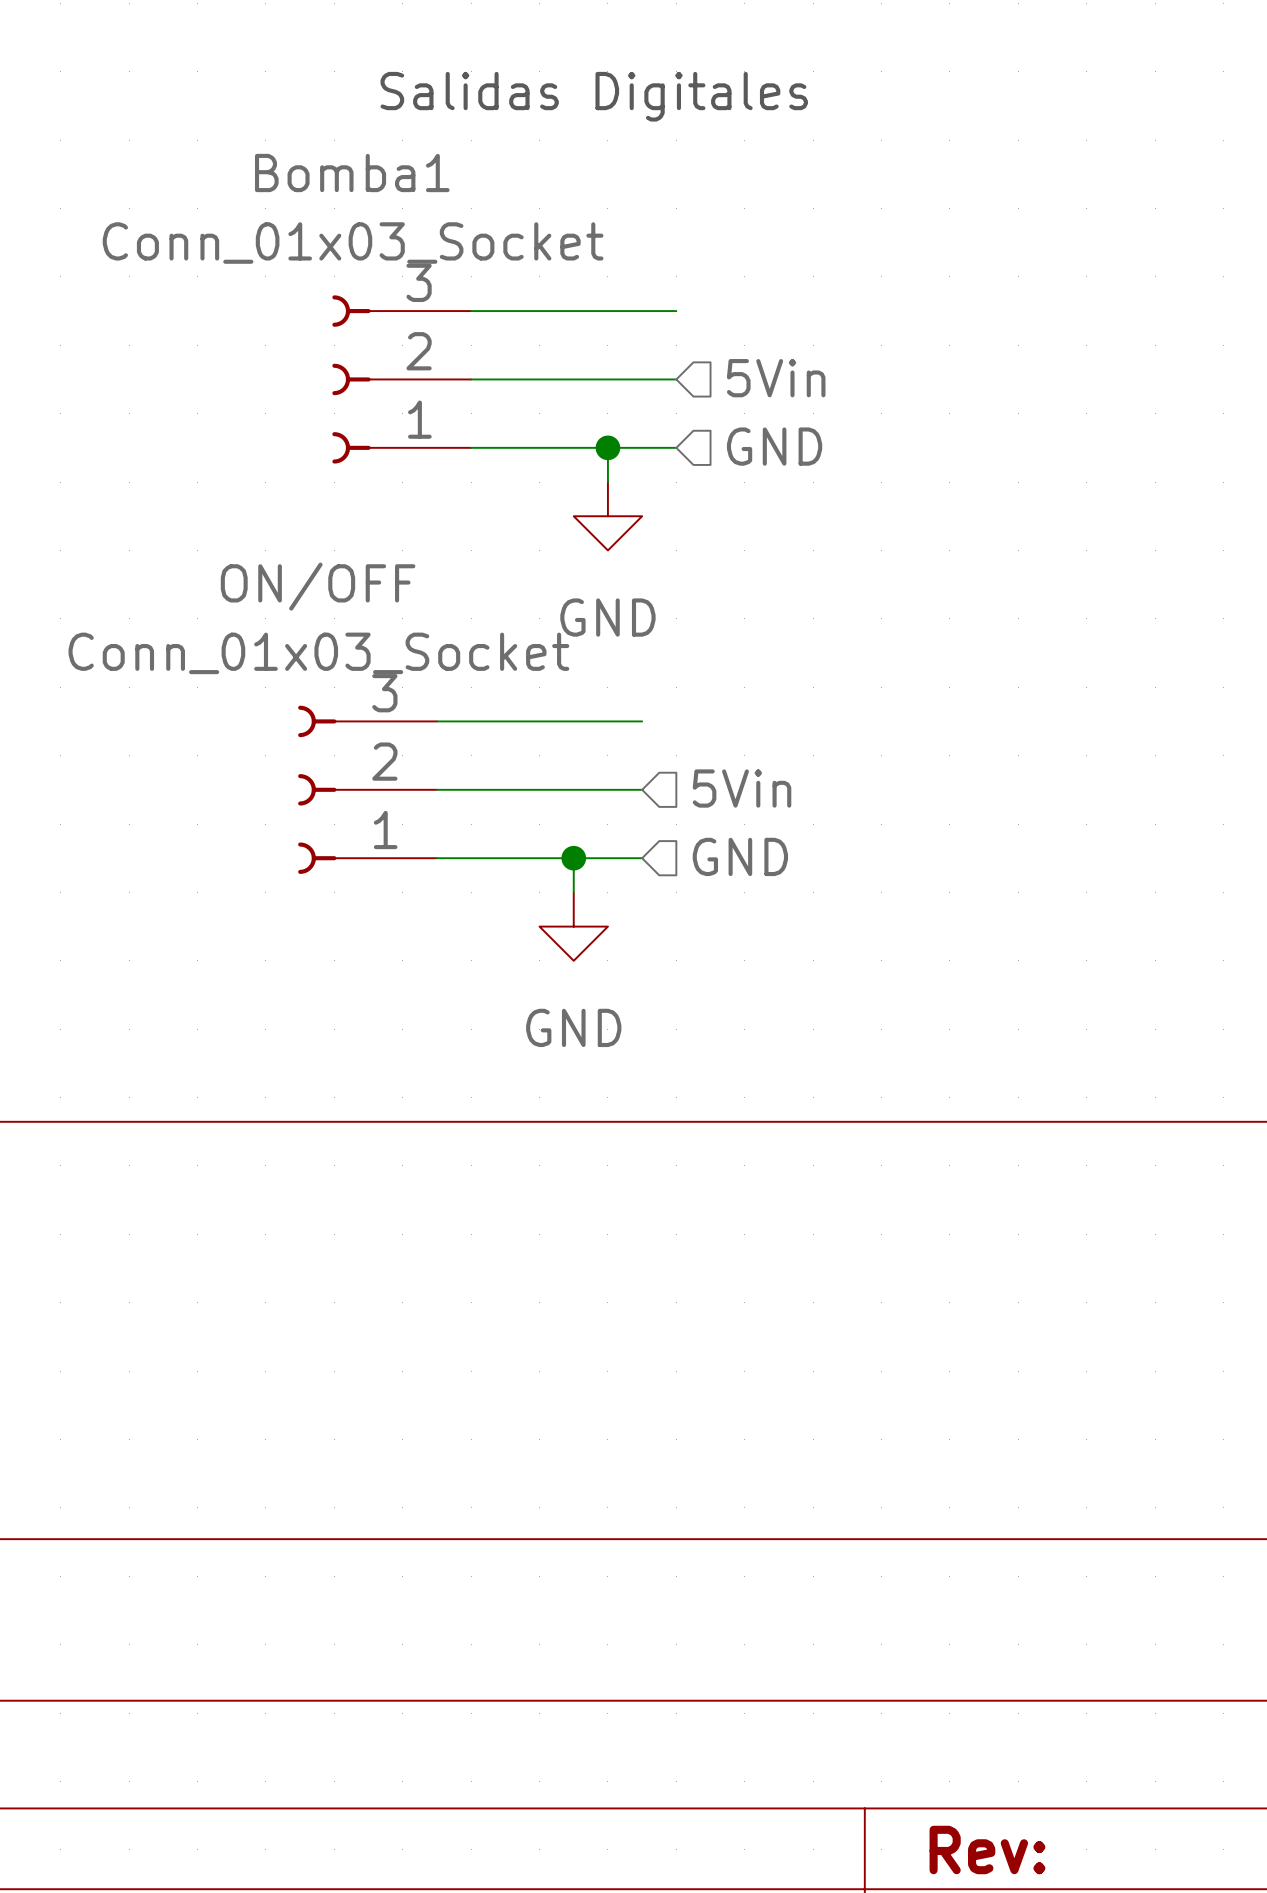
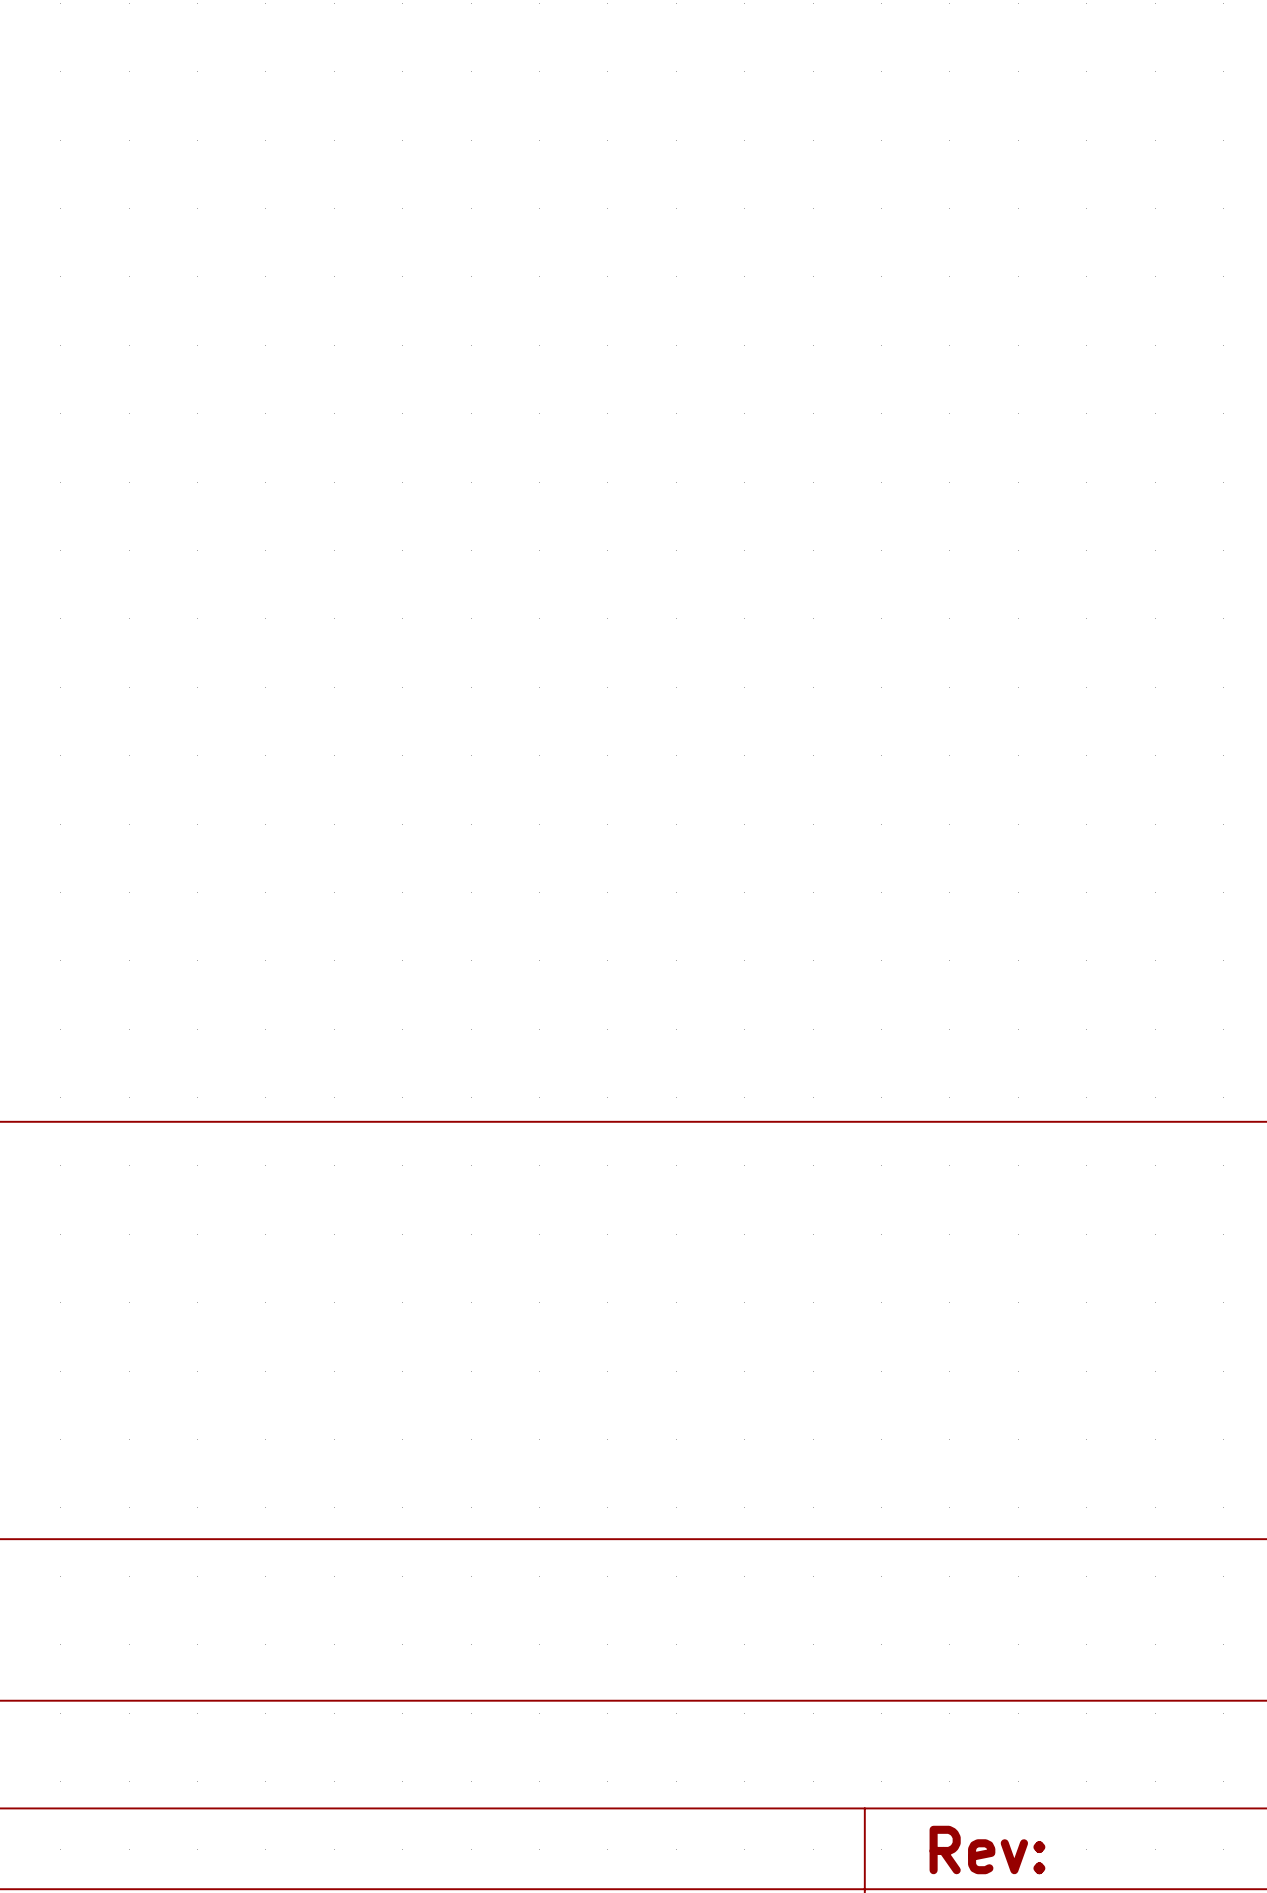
text: Salidas Digitales (594, 96) -> none
wire: (471, 311) (676, 311) -> none
hierarchical label: 5Vin (776, 378) -> none
Bomba1: Conn_01x03_Socket (401, 379) -> none
wire: (471, 379) (676, 379) -> none
hierarchical label: GND (774, 446) -> none
wire: (471, 447) (676, 447) -> none
wire: (607, 447) (607, 482) -> none
junction: (607, 447) -> none
power symbol: GND (607, 516) -> none
wire: (436, 721) (642, 721) -> none
hierarchical label: 5Vin (742, 788) -> none
ON/OFF: Conn_01x03_Socket (367, 789) -> none
wire: (436, 789) (642, 789) -> none
hierarchical label: GND (740, 856) -> none
wire: (436, 858) (642, 858) -> none
wire: (573, 858) (573, 892) -> none
junction: (573, 858) -> none
power symbol: GND (573, 926) -> none

